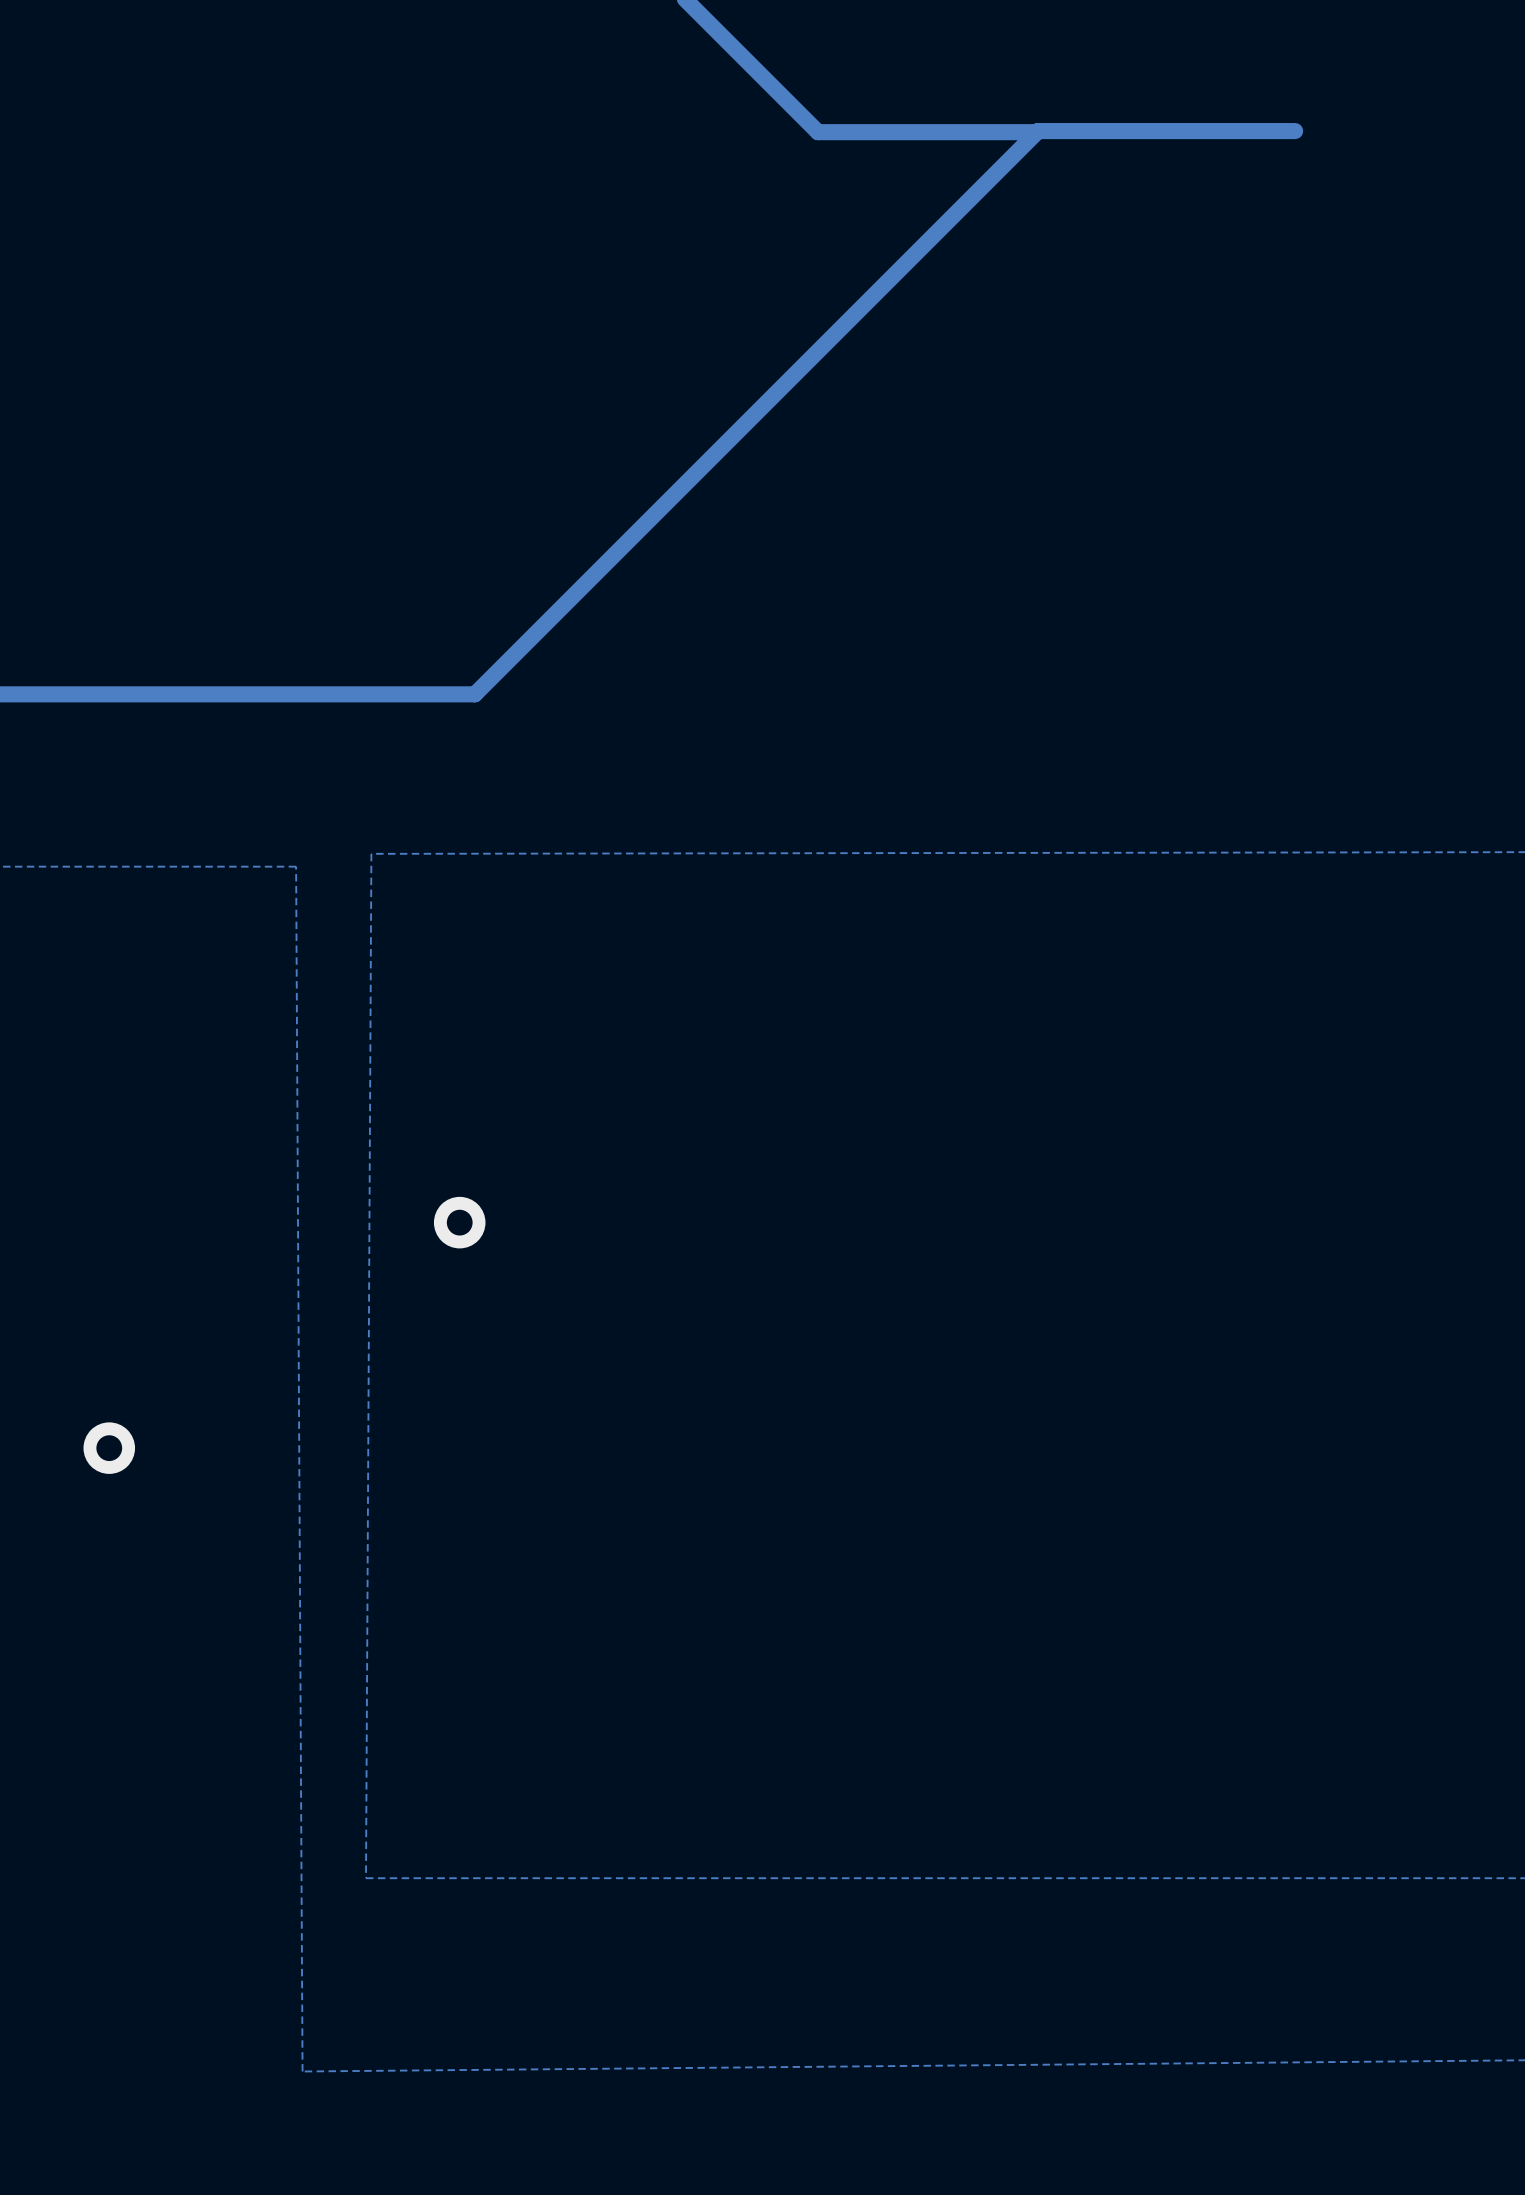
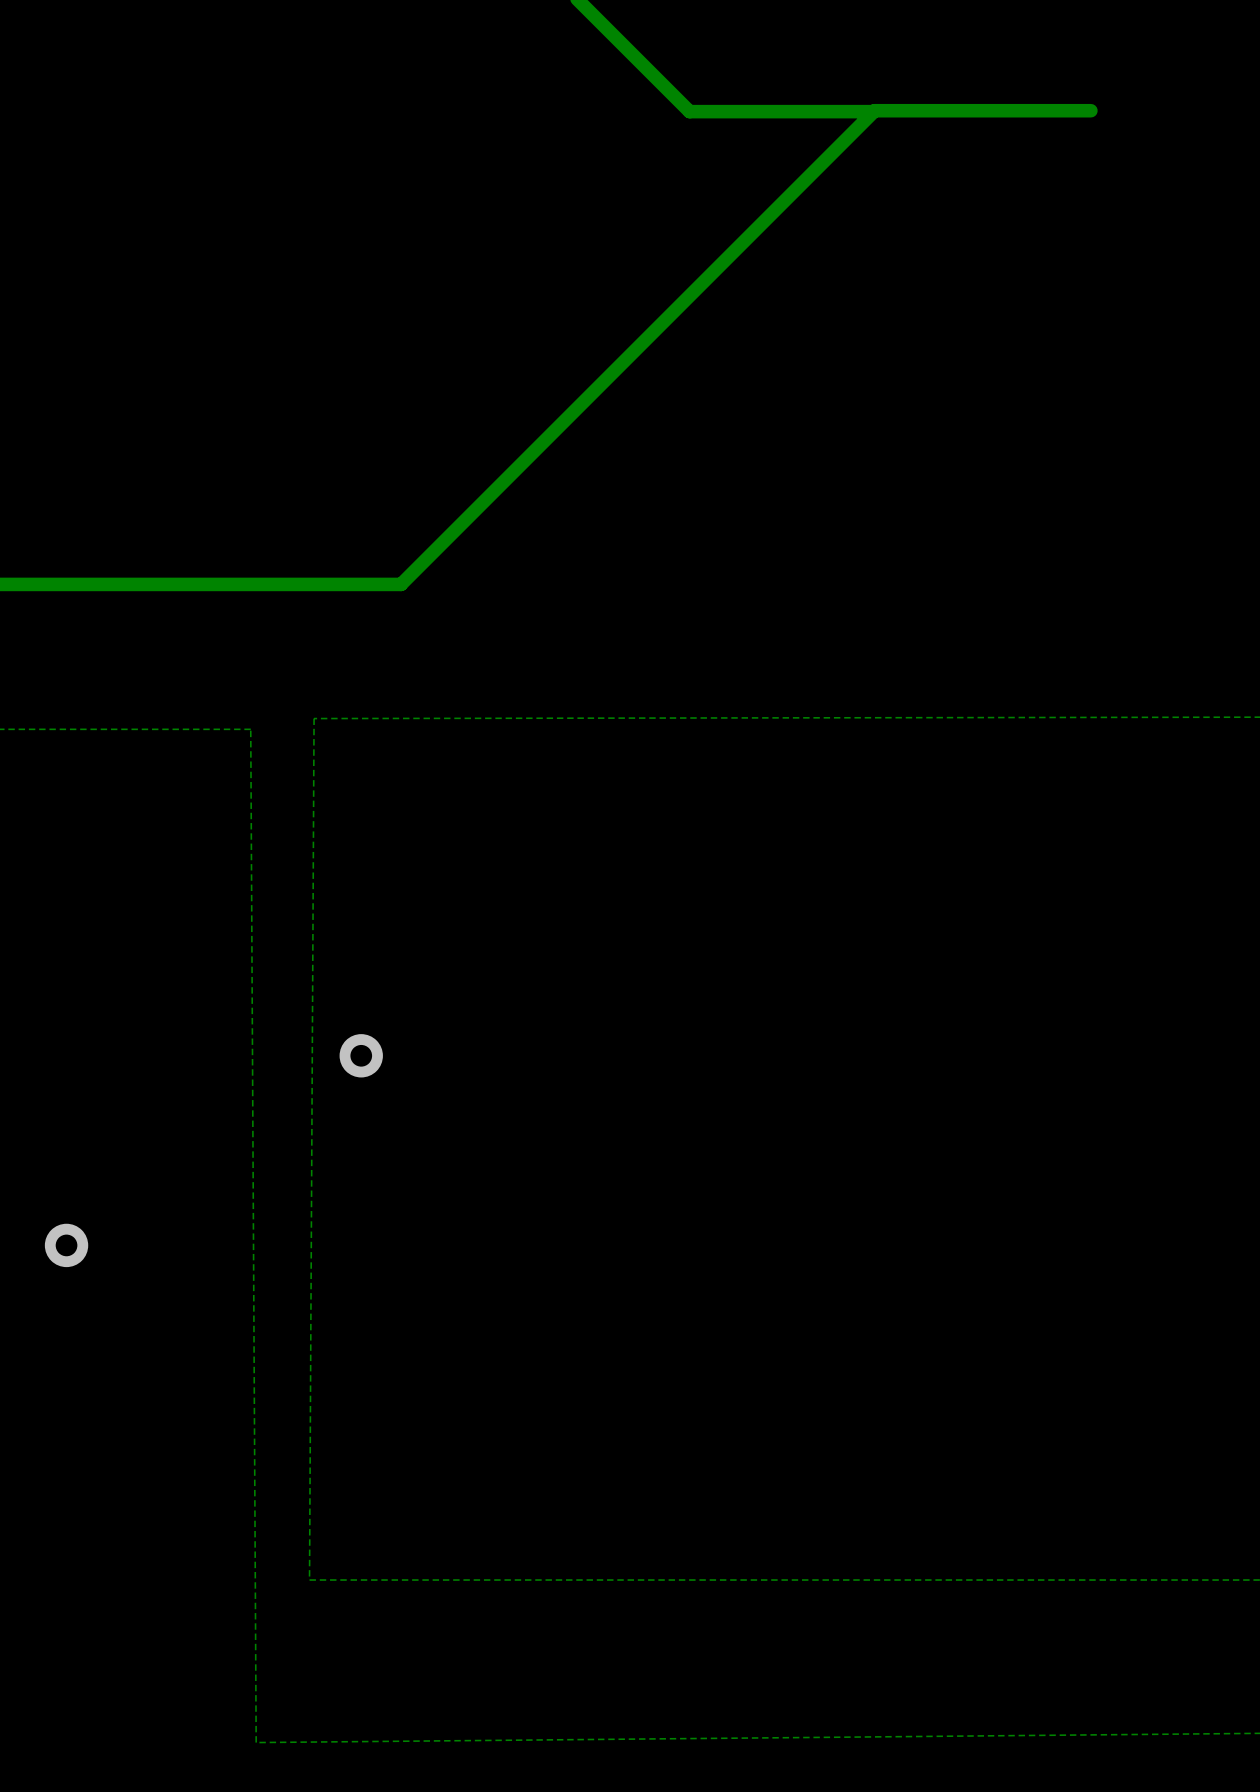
via position: (459, 1222) -> (361, 1055)
via position: (109, 1448) -> (66, 1245)

